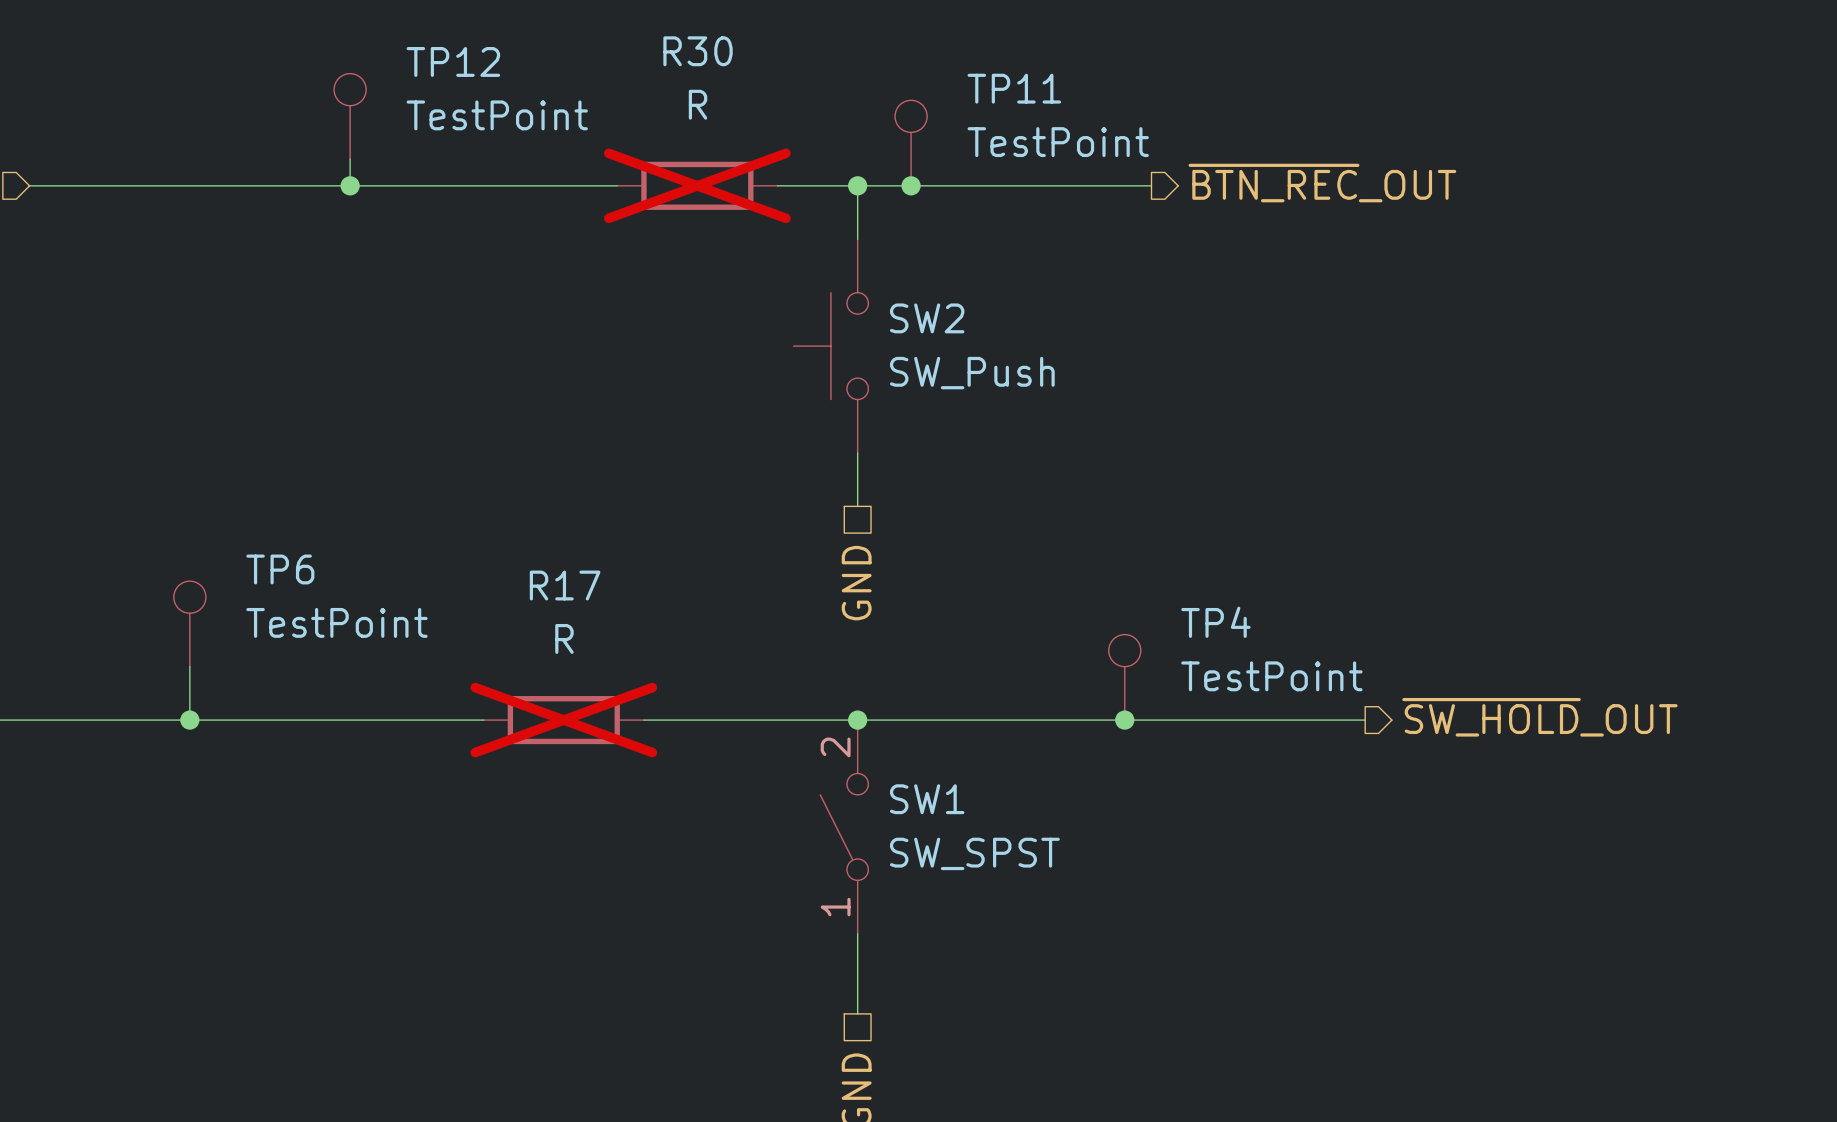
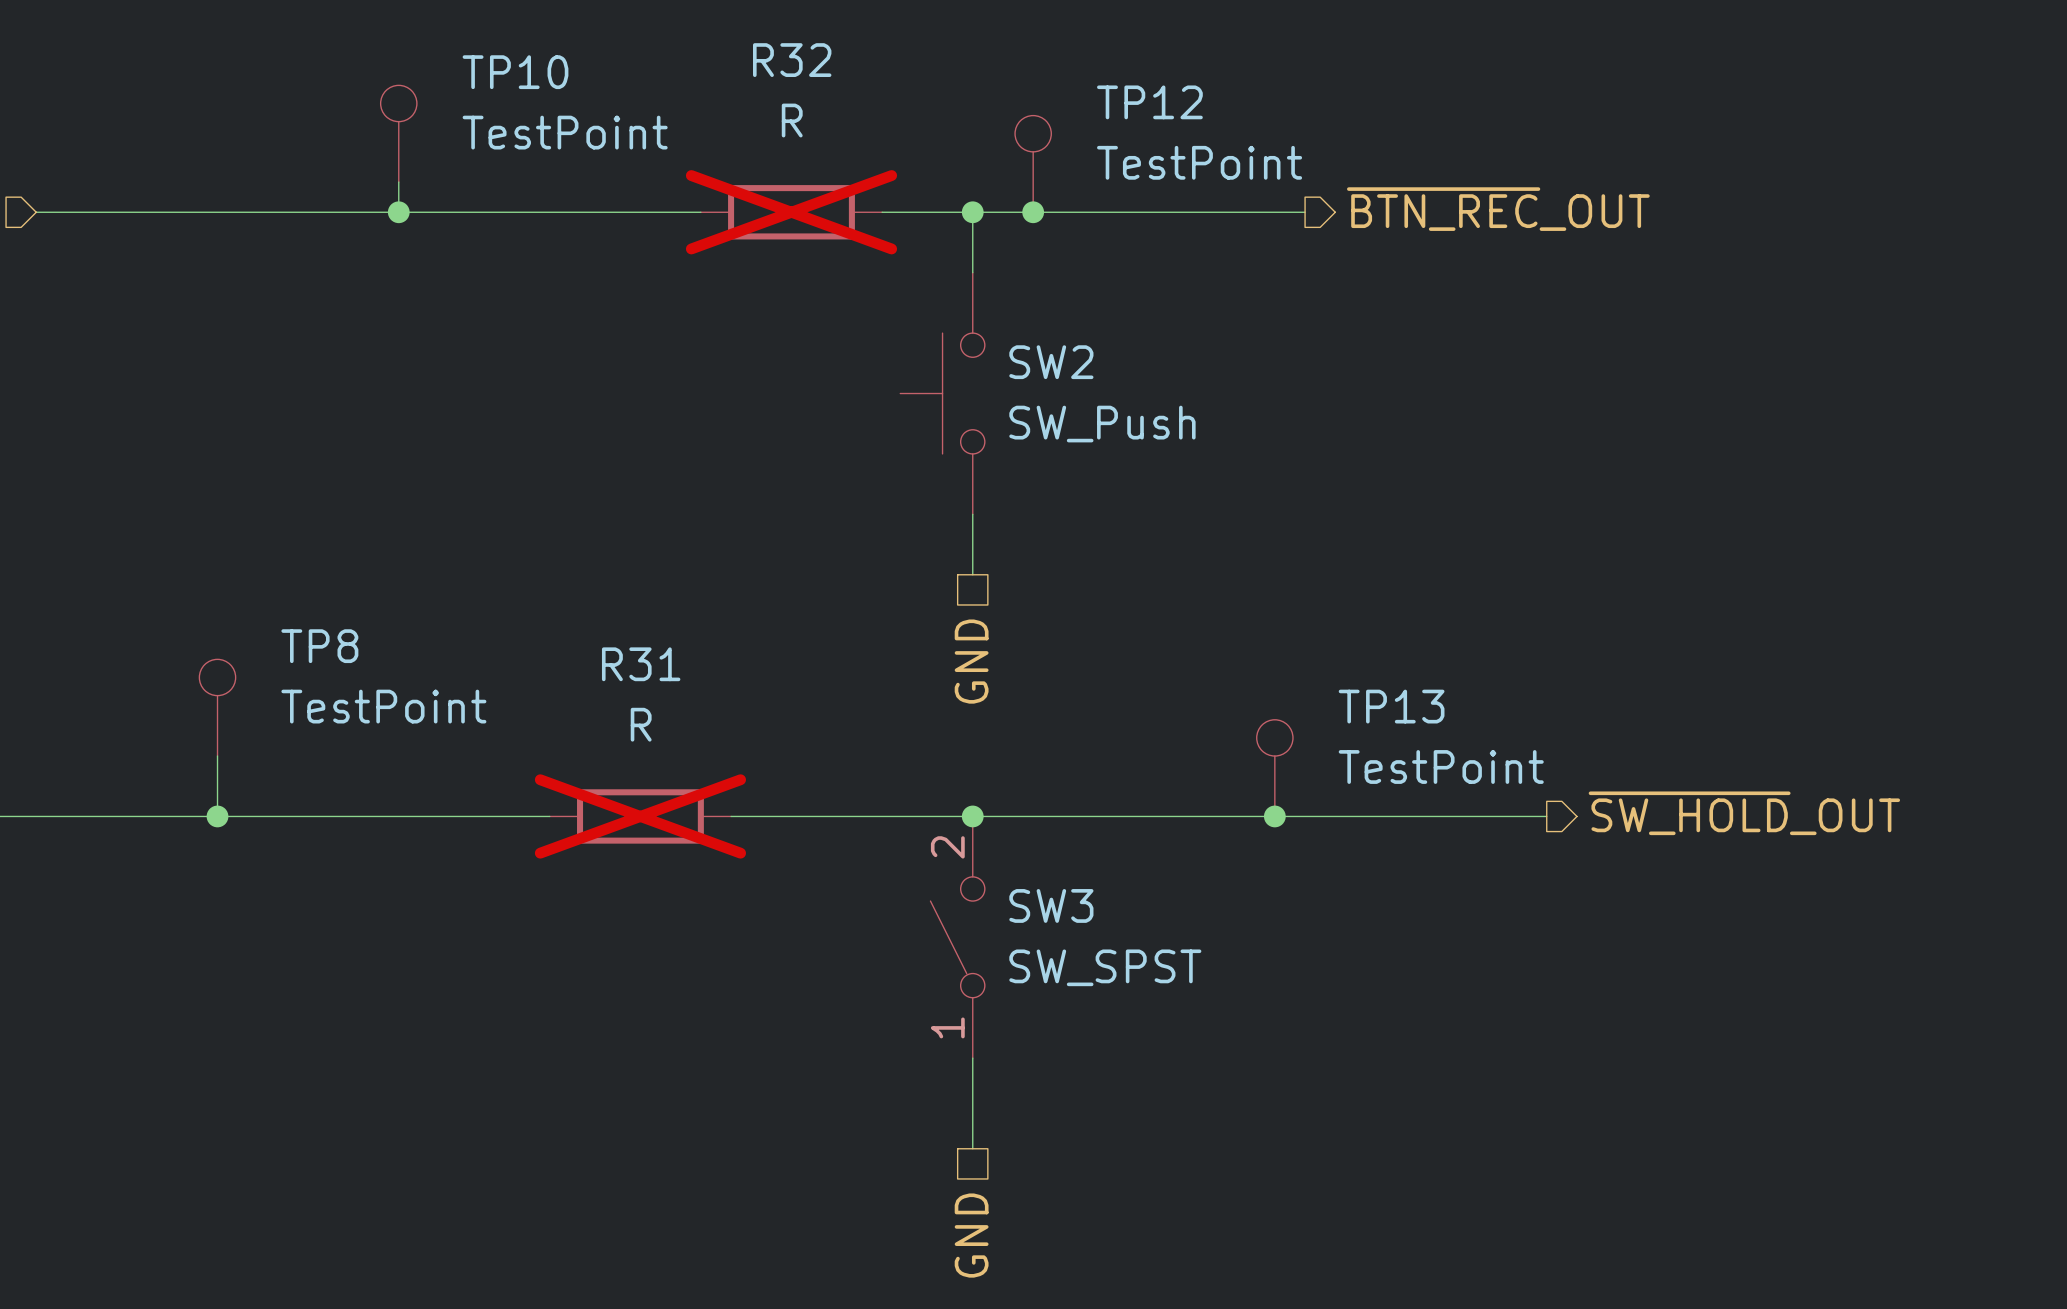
R30 name: R30 (698, 51) -> R32 (792, 60)
TP12 name: TP12 (453, 61) -> TP10 (515, 72)
TP11 name: TP11 (1014, 88) -> TP12 (1149, 102)
TP6 name: TP6 (280, 569) -> TP8 (319, 646)
R17 name: R17 (565, 585) -> R31 (641, 664)
TP4 name: TP4 (1215, 622) -> TP13 (1391, 706)
SW1 name: SW1 (927, 799) -> SW3 (1051, 905)

